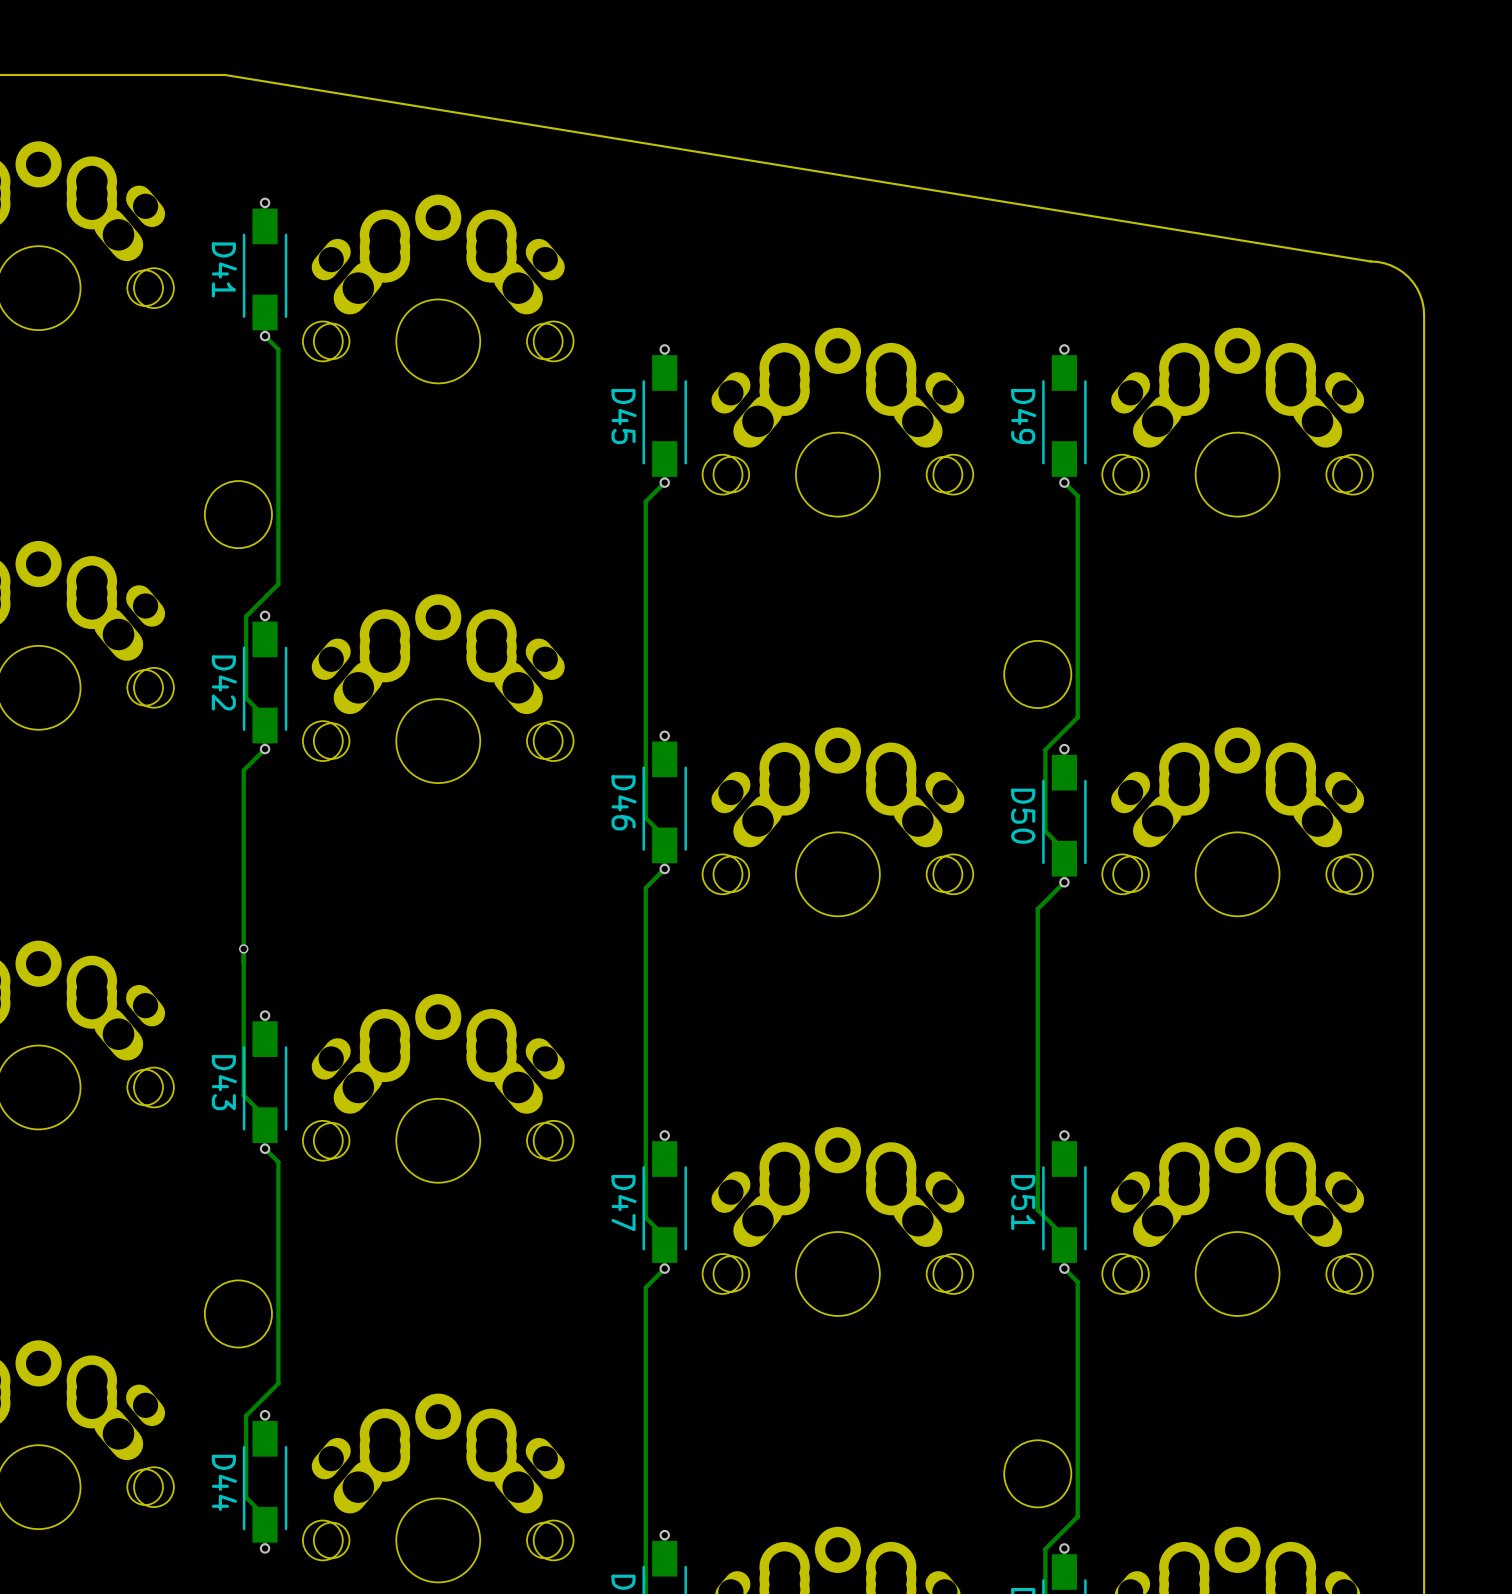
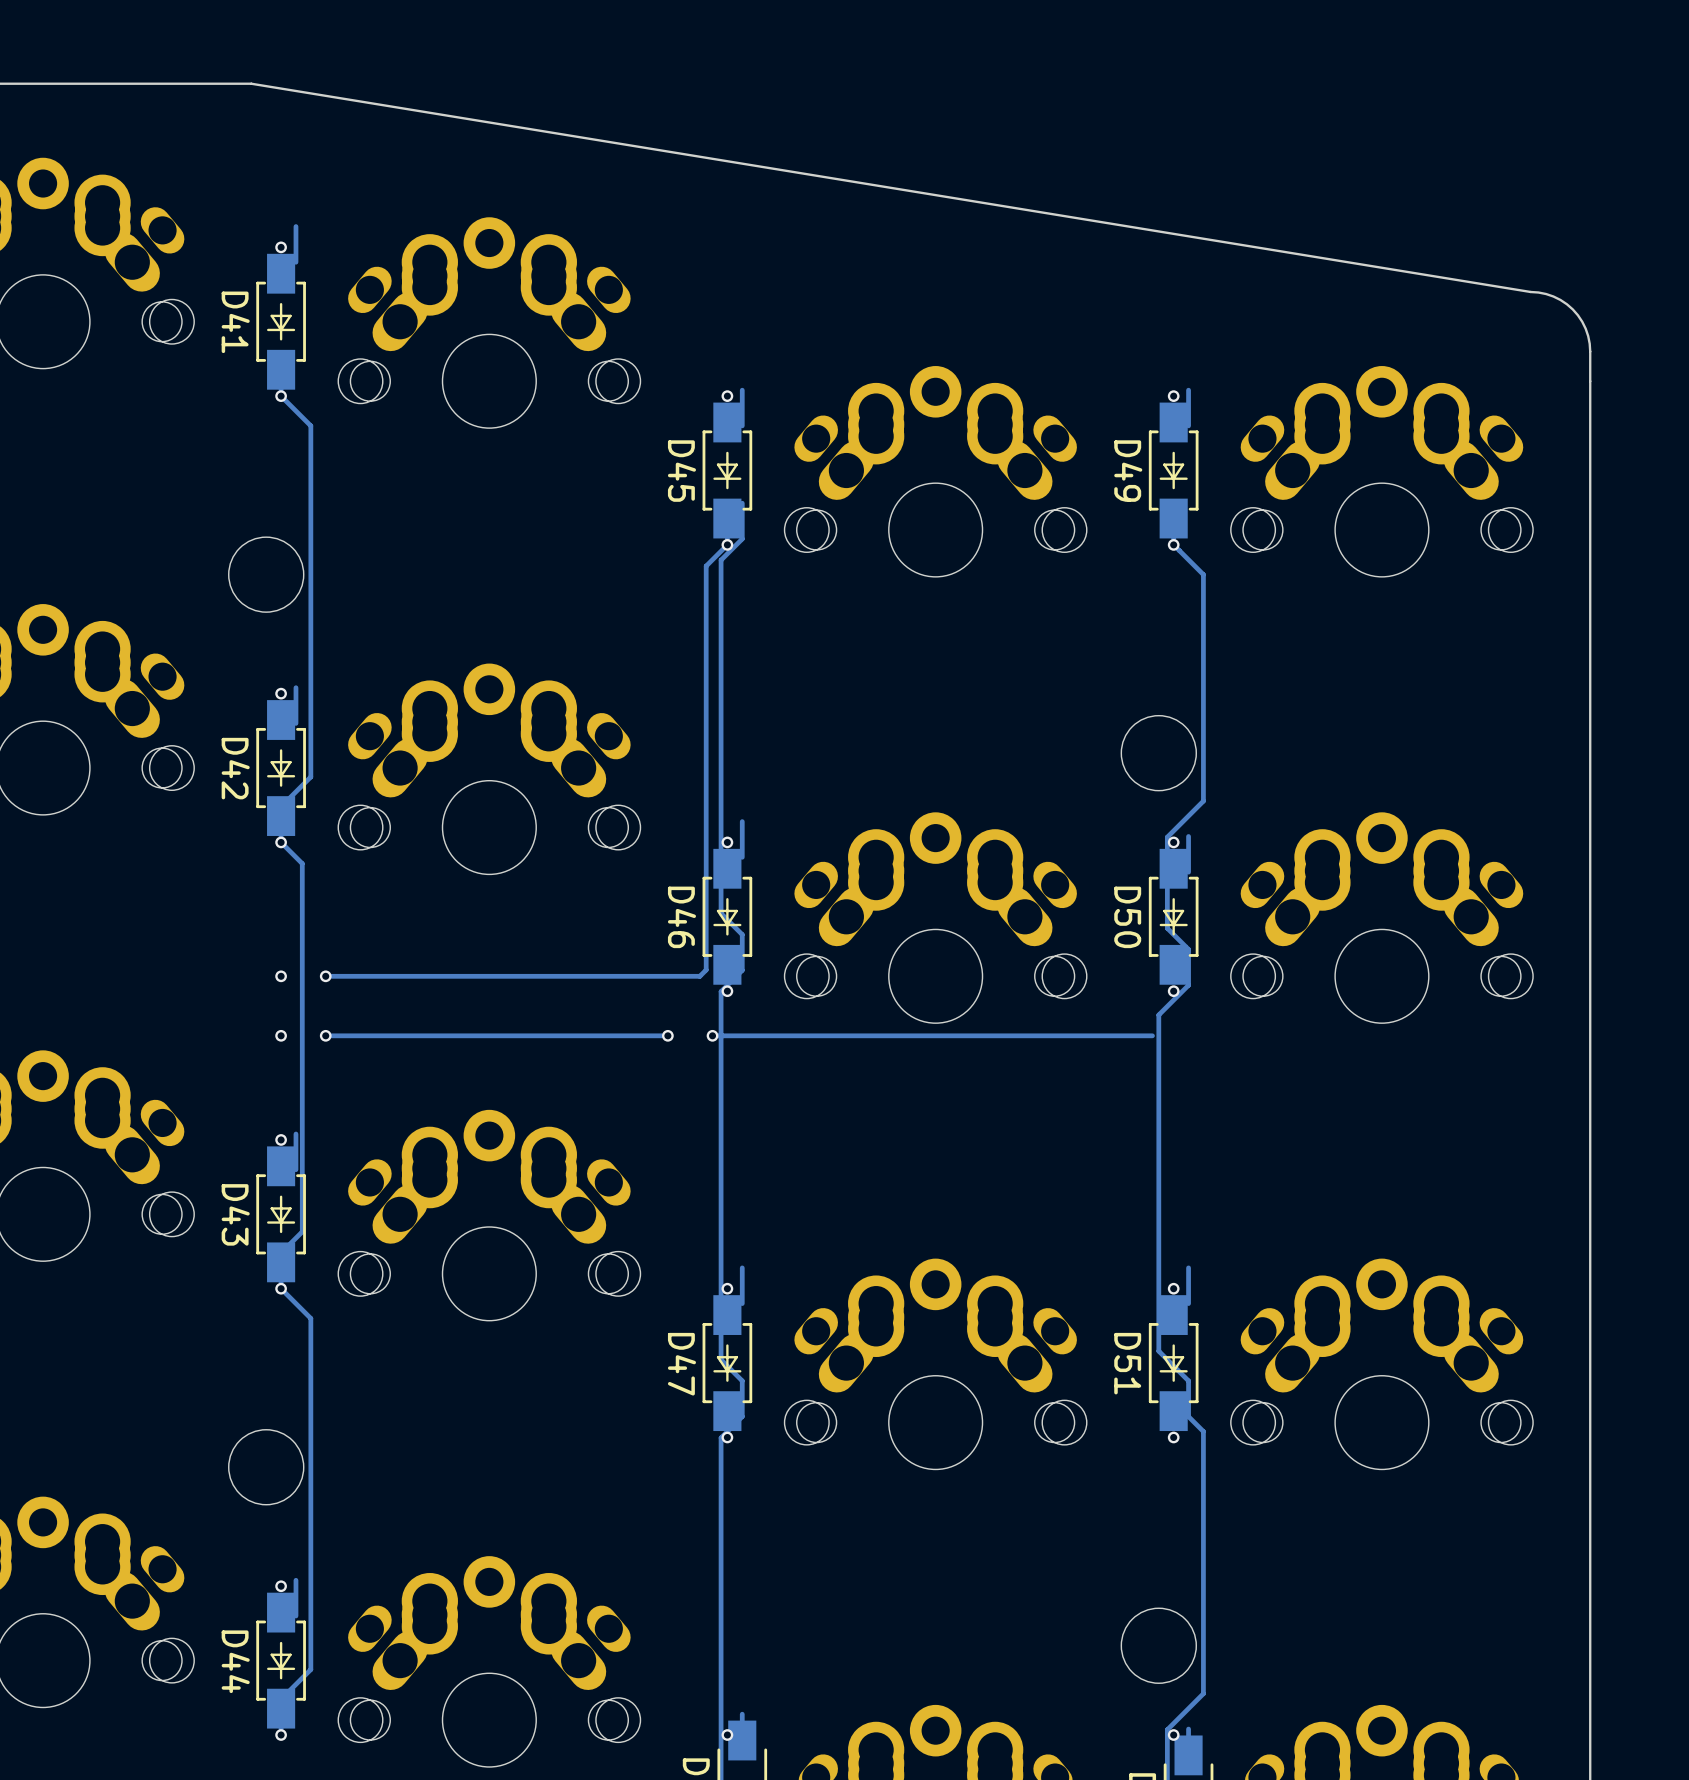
via position: (265, 202) -> (281, 247)
D41 footprint: [242, 208, 288, 331] -> [256, 253, 306, 390]
track: (265, 304) (265, 336) (278, 349) (278, 381) -> (281, 360) (281, 396) (310, 425)
via position: (265, 336) -> (281, 396)
via position: (664, 349) -> (727, 396)
via position: (1064, 349) -> (1173, 396)
D45 footprint: [642, 355, 687, 477] -> [702, 402, 753, 539]
D49 footprint: [1042, 355, 1087, 477] -> [1148, 402, 1199, 539]
D45 name position: D45 (624, 416) -> D45 (681, 471)
D49 name position: D49 (1023, 416) -> D49 (1128, 471)
track: (1064, 450) (1064, 482) (1077, 495) (1077, 514) -> (1173, 509) (1173, 544) (1203, 574)
track: none -> (727, 509) (727, 544) (706, 566) (706, 969) (699, 976) (325, 976)
via position: (664, 482) -> (727, 544)
via position: (1064, 482) -> (1173, 544)
track: (278, 584) (246, 616) (246, 698) (265, 717) (265, 749) (243, 770) (243, 1095) (265, 1116) (265, 1148) (278, 1162) (278, 1180) -> (310, 652) (310, 776) (281, 806) (281, 842) (302, 863) (302, 1231) (281, 1252) (281, 1288) (310, 1318)
via position: (265, 615) -> (281, 693)
D42 footprint: [242, 621, 288, 744] -> [256, 700, 306, 836]
D42 name position: D42 (224, 682) -> D42 (235, 768)
via position: (664, 735) -> (727, 842)
D46 footprint: [642, 741, 687, 864] -> [702, 848, 753, 985]
via position: (265, 749) -> (281, 842)
via position: (1064, 749) -> (1173, 842)
D50 footprint: [1042, 754, 1087, 877] -> [1148, 848, 1199, 985]
D50 name position: D50 (1023, 816) -> D50 (1127, 917)
via position: (664, 868) -> (727, 991)
via: none -> (281, 976)
via: none -> (325, 976)
via position: (1064, 882) -> (1173, 991)
via: none -> (281, 1035)
via: none -> (325, 1035)
track: none -> (667, 1035) (325, 1035)
via: none -> (667, 1035)
via: none -> (712, 1035)
track: none -> (1152, 1035) (712, 1035)
via: (243, 948) -> none
via position: (265, 1015) -> (281, 1139)
D43 footprint: [242, 1021, 288, 1143] -> [256, 1146, 306, 1283]
D43 name position: D43 (224, 1082) -> D43 (235, 1214)
via position: (664, 1135) -> (727, 1288)
via position: (1064, 1135) -> (1173, 1288)
D47 footprint: [642, 1141, 687, 1263] -> [702, 1295, 753, 1432]
D51 footprint: [1042, 1141, 1087, 1263] -> [1148, 1295, 1199, 1432]
via position: (265, 1148) -> (281, 1288)
via position: (664, 1268) -> (727, 1437)
via position: (1064, 1268) -> (1173, 1437)
track: (278, 1383) (246, 1415) (246, 1497) (265, 1516) (265, 1548) -> (310, 1544) (310, 1669) (281, 1699) (281, 1735)
via position: (265, 1415) -> (281, 1586)
D44 footprint: [242, 1420, 288, 1543] -> [256, 1592, 306, 1729]
D44 name position: D44 (224, 1482) -> D44 (235, 1661)
via position: (664, 1535) -> (727, 1735)
via position: (265, 1548) -> (281, 1735)
via position: (1064, 1548) -> (1173, 1735)

